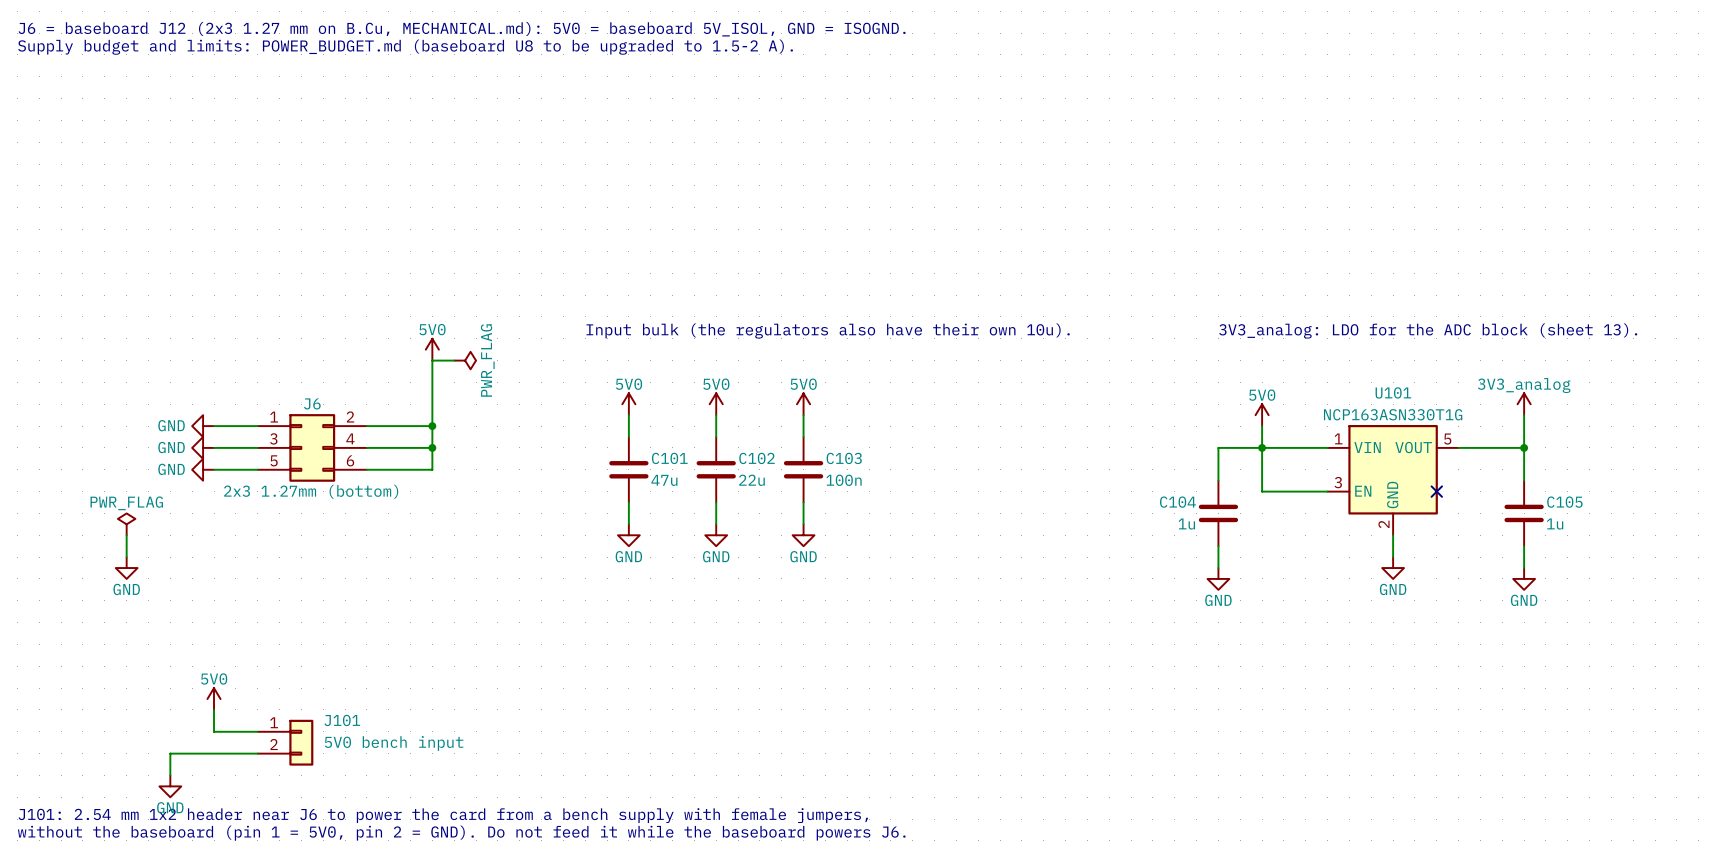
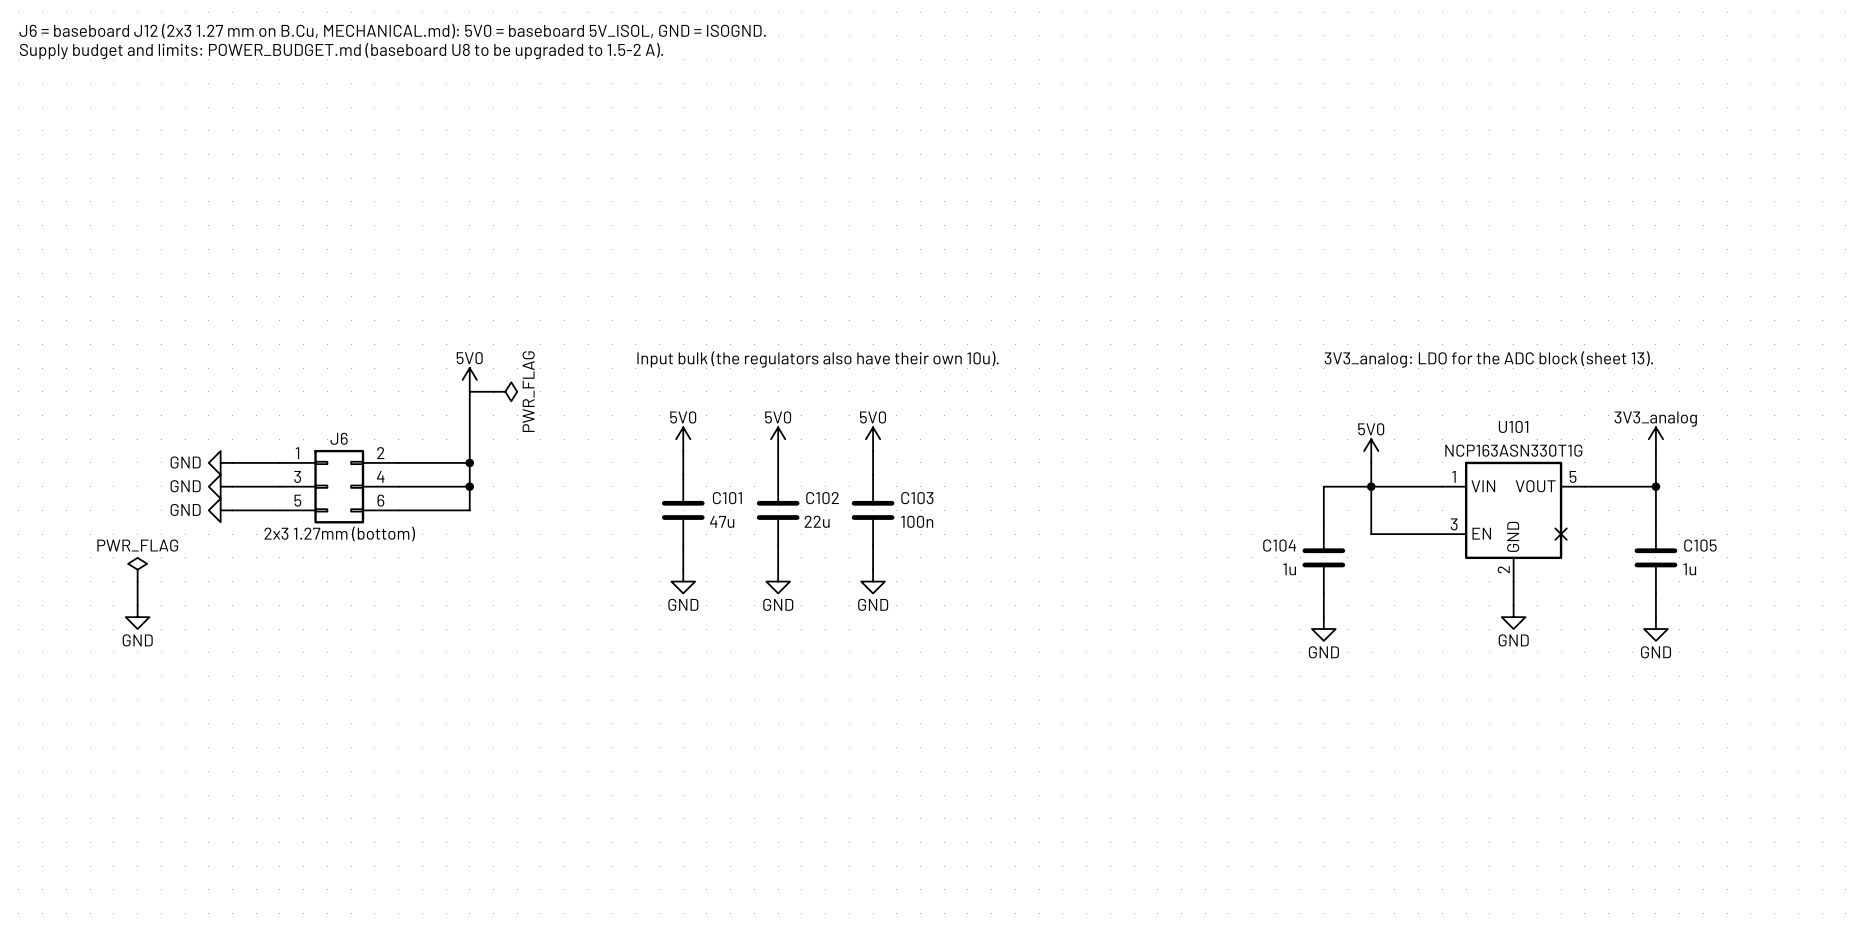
power symbol: 5V0 (214, 699) -> none
wire: (214, 709) (214, 731) (257, 731) -> none
J101: 5V0 bench input (285, 742) -> none
wire: (257, 753) (170, 753) (170, 775) -> none
power symbol: GND (170, 786) -> none
text: J101: 2.54 mm 1x2 header near J6 to power the card from a bench supply with female jumpers, (443, 815) -> none
text: without the baseboard (pin 1 = 5V0, pin 2 = GND). Do not feed it while the baseboard powers J6. (461, 833) -> none

